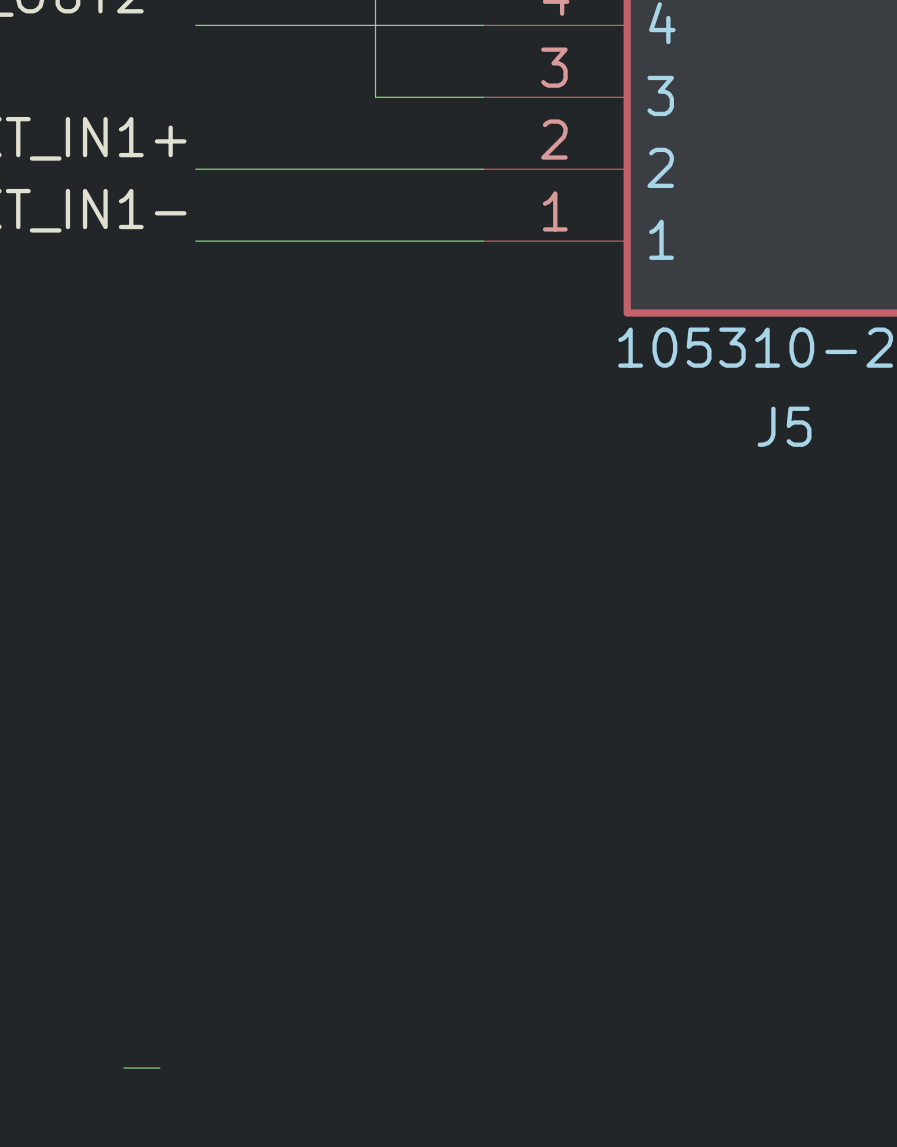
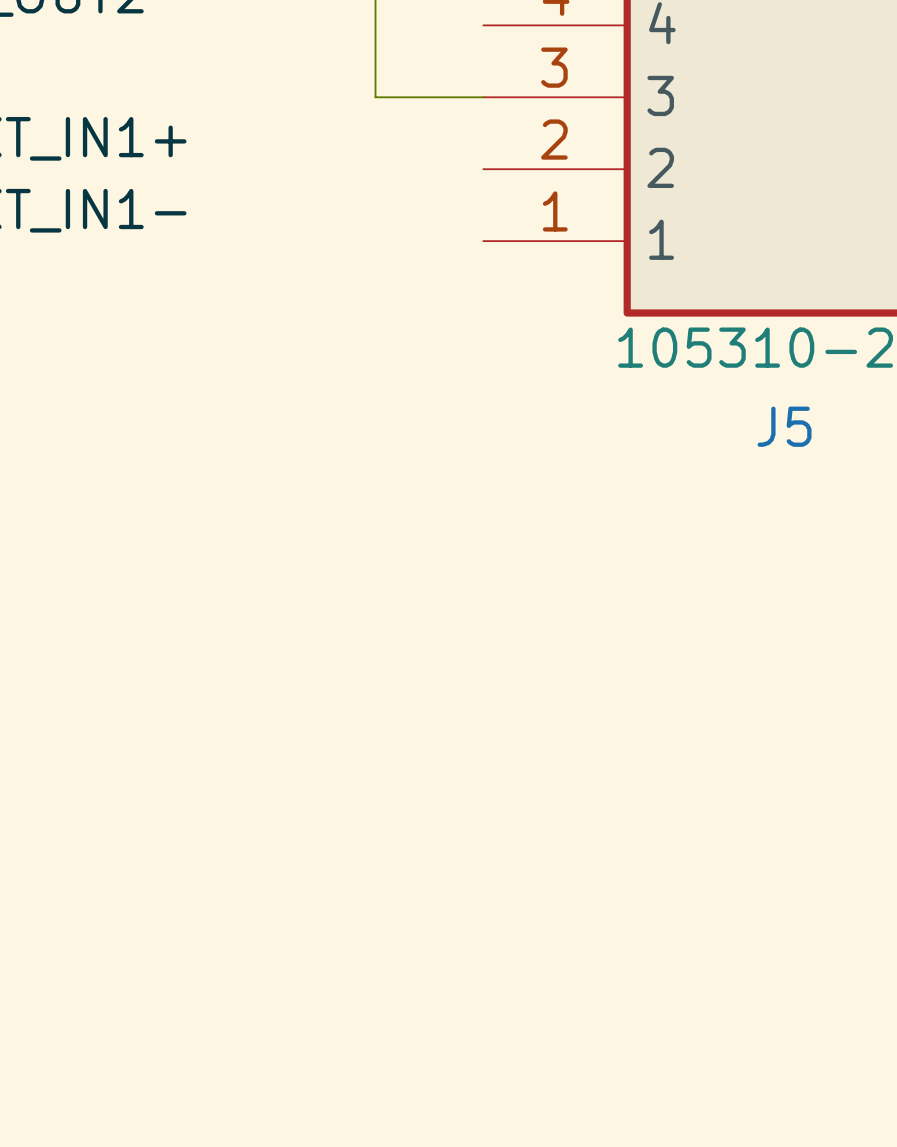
wire: (195, 25) (483, 25) -> none
wire: (195, 169) (483, 169) -> none
wire: (195, 241) (483, 241) -> none
wire: (123, 1068) (159, 1068) -> none

